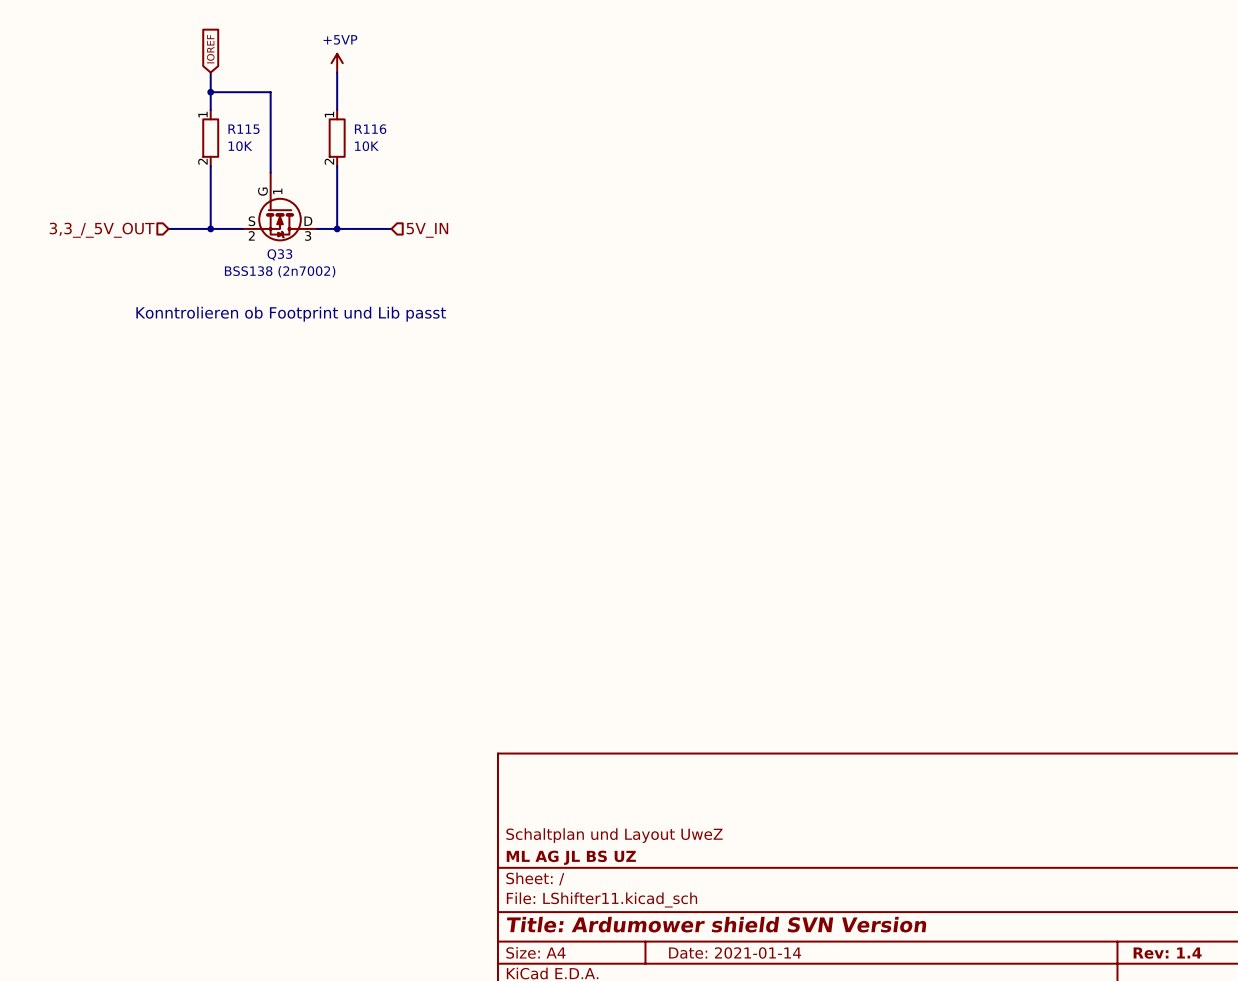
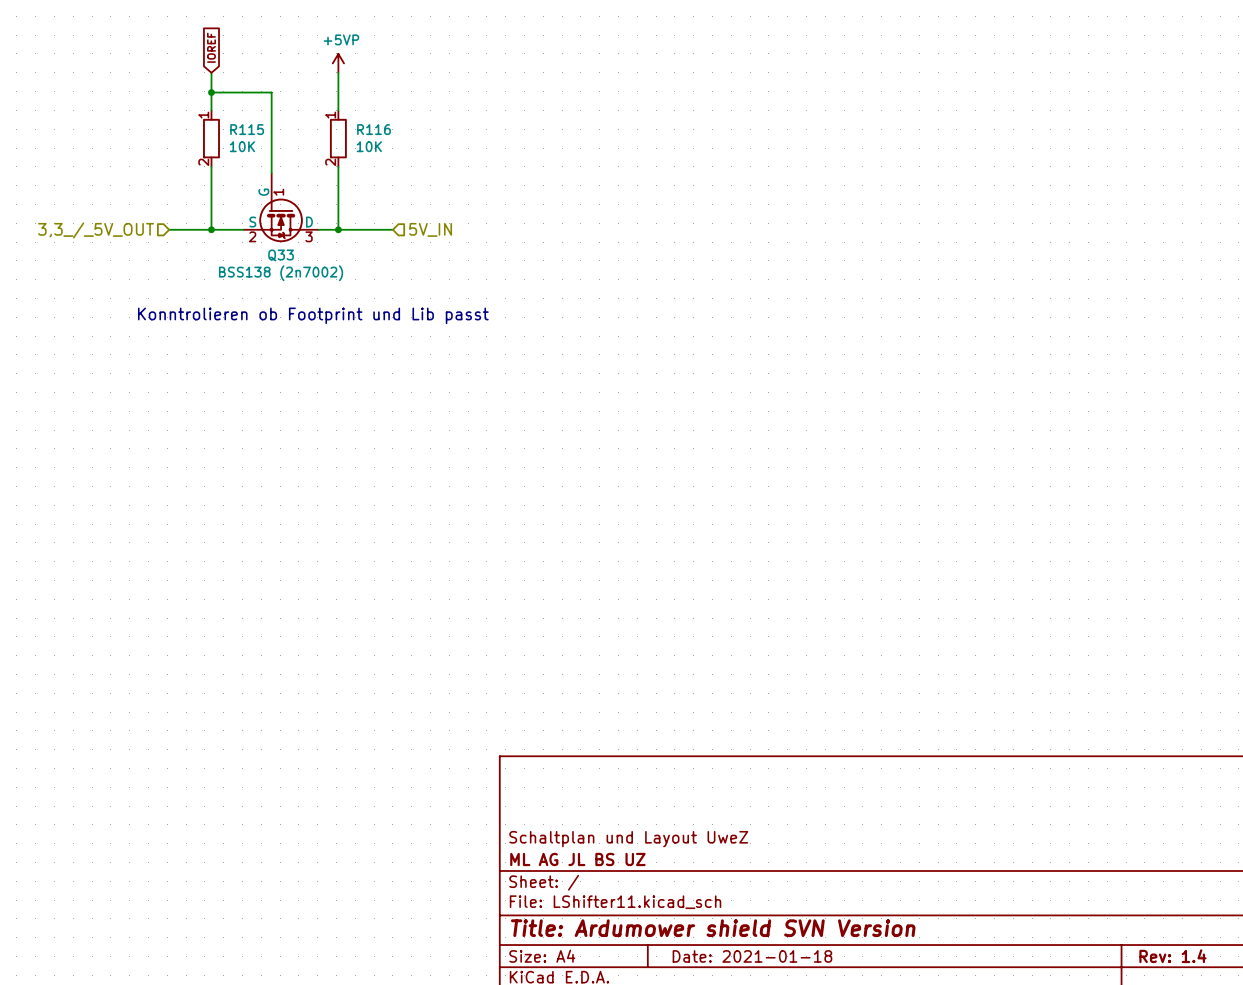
title block: Date: 2021-01-14 (735, 952) -> Date: 2021-01-18 (752, 956)

